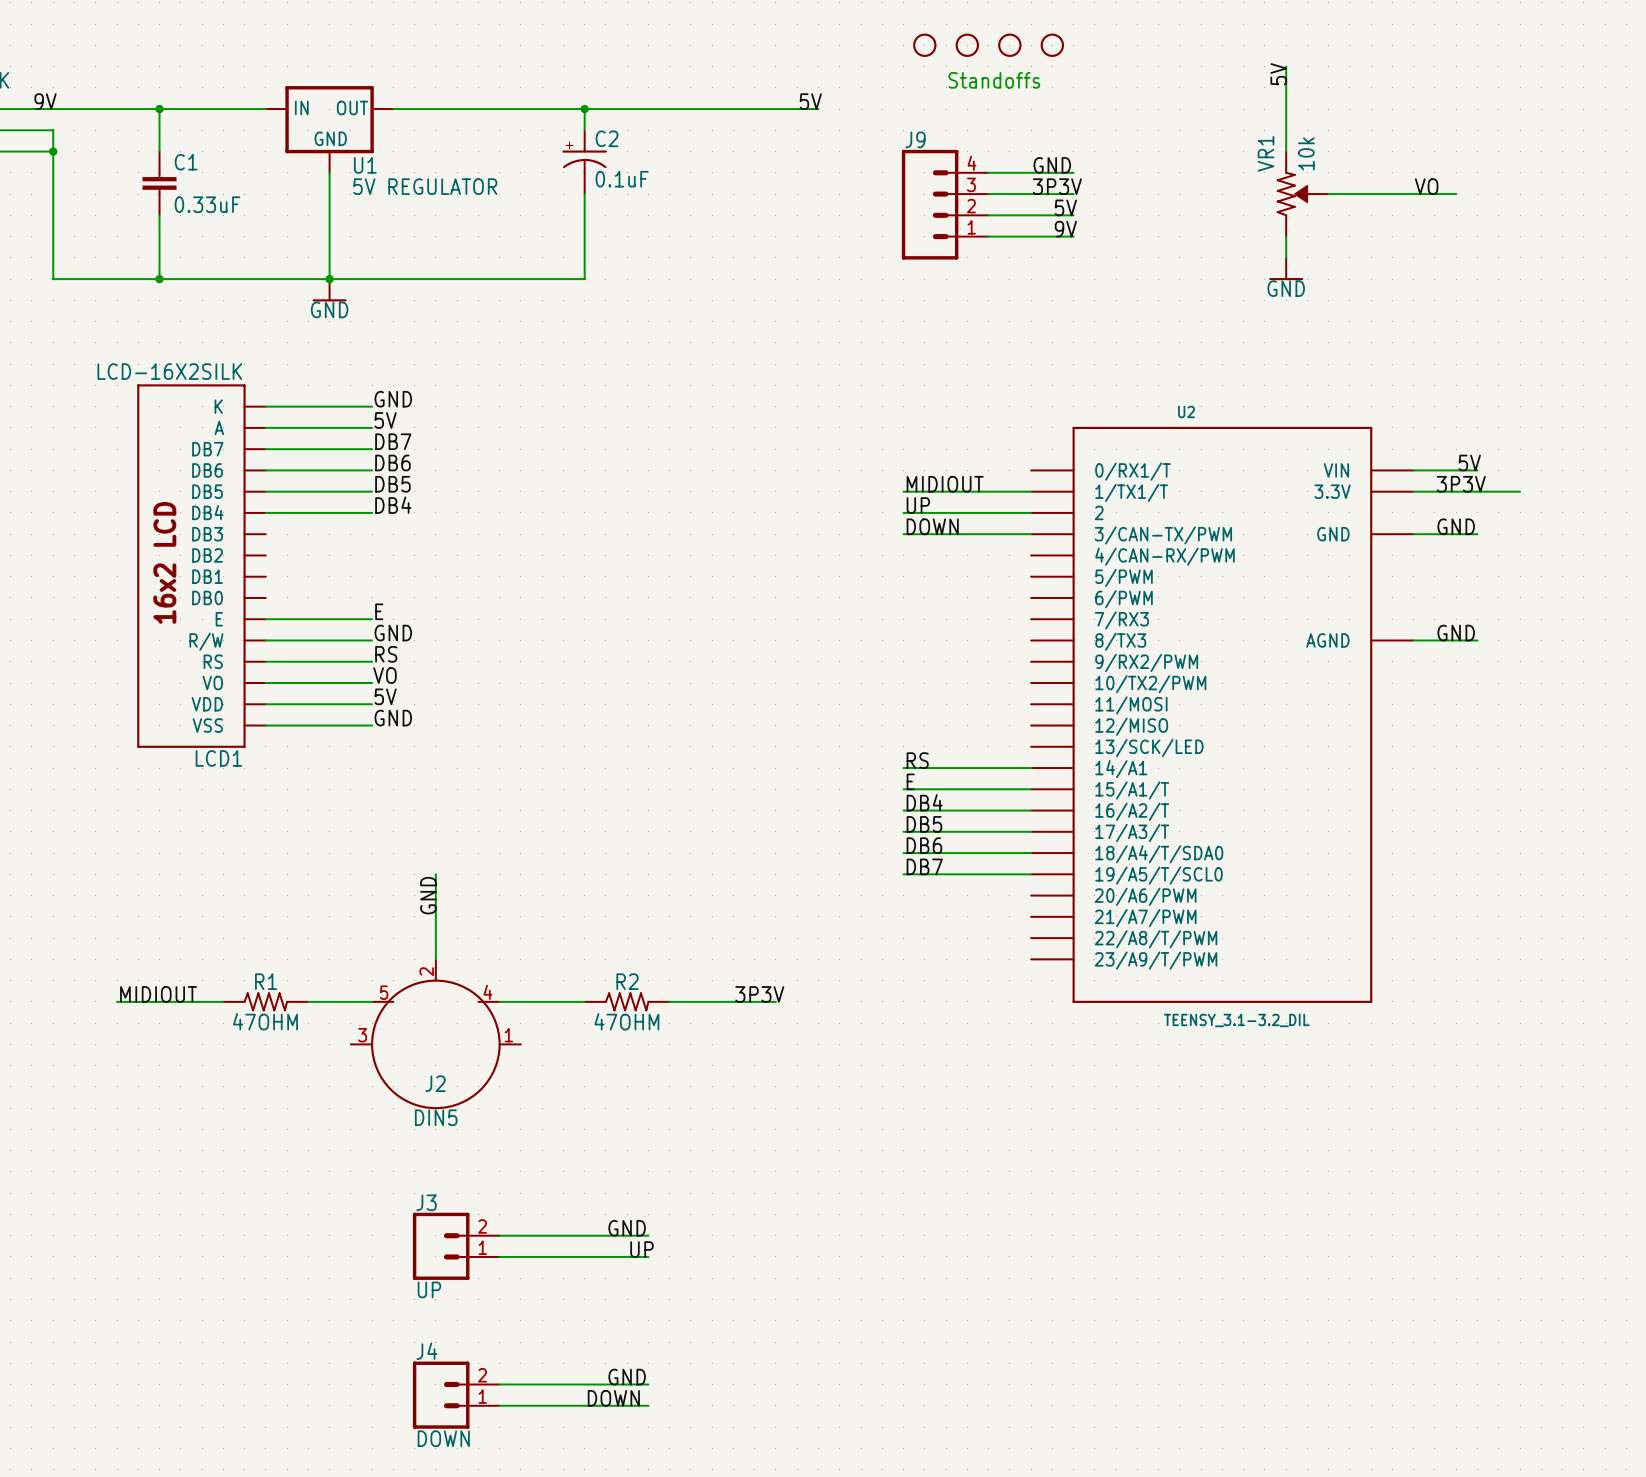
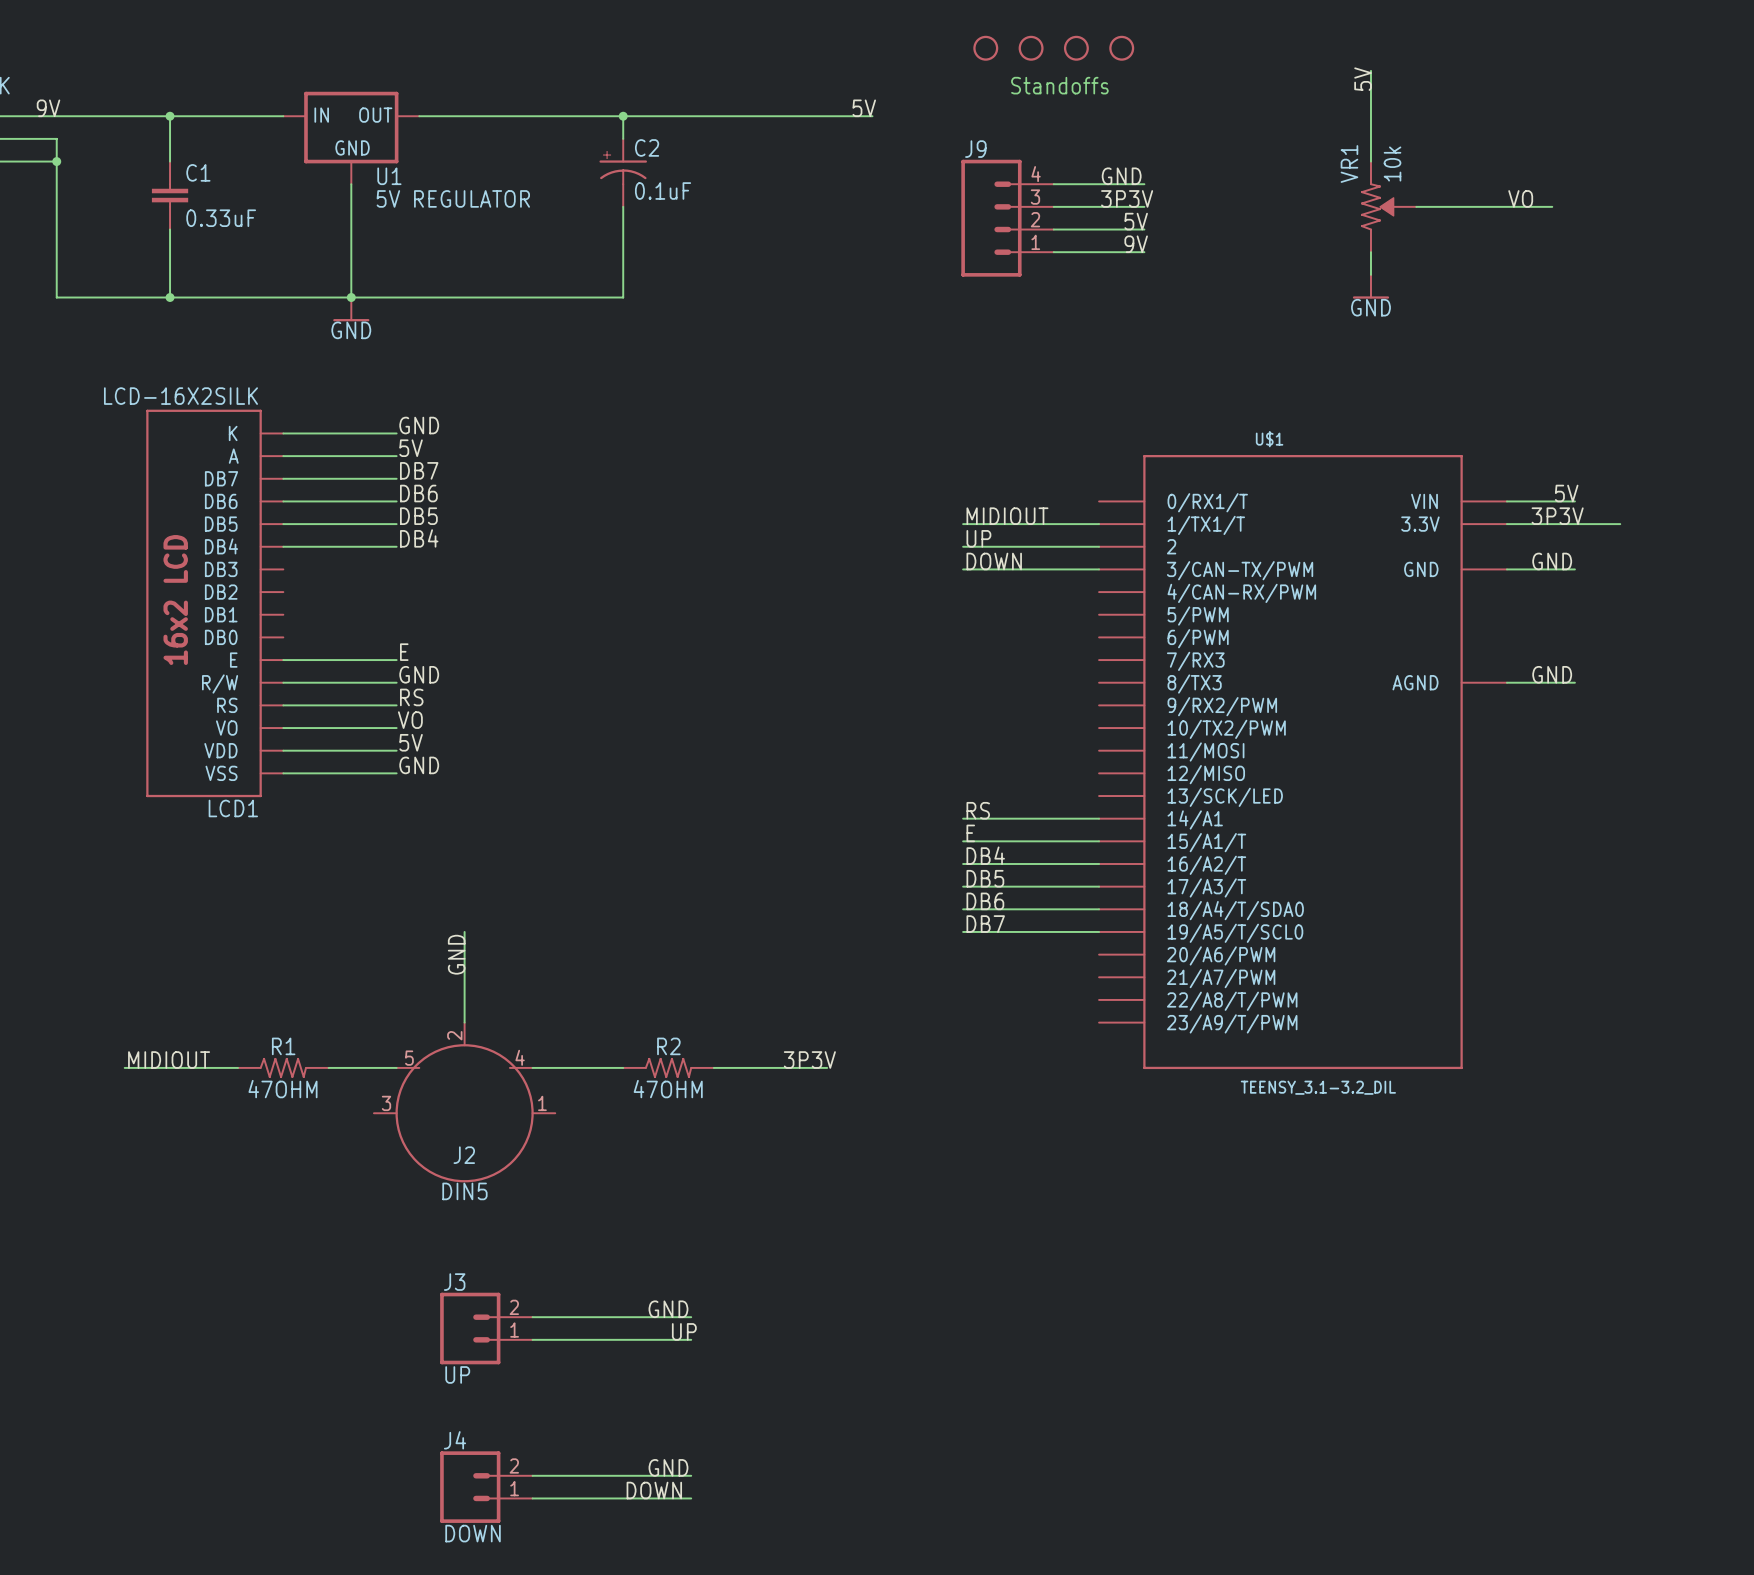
U2 name: U2 (1186, 411) -> U$1 (1269, 439)

